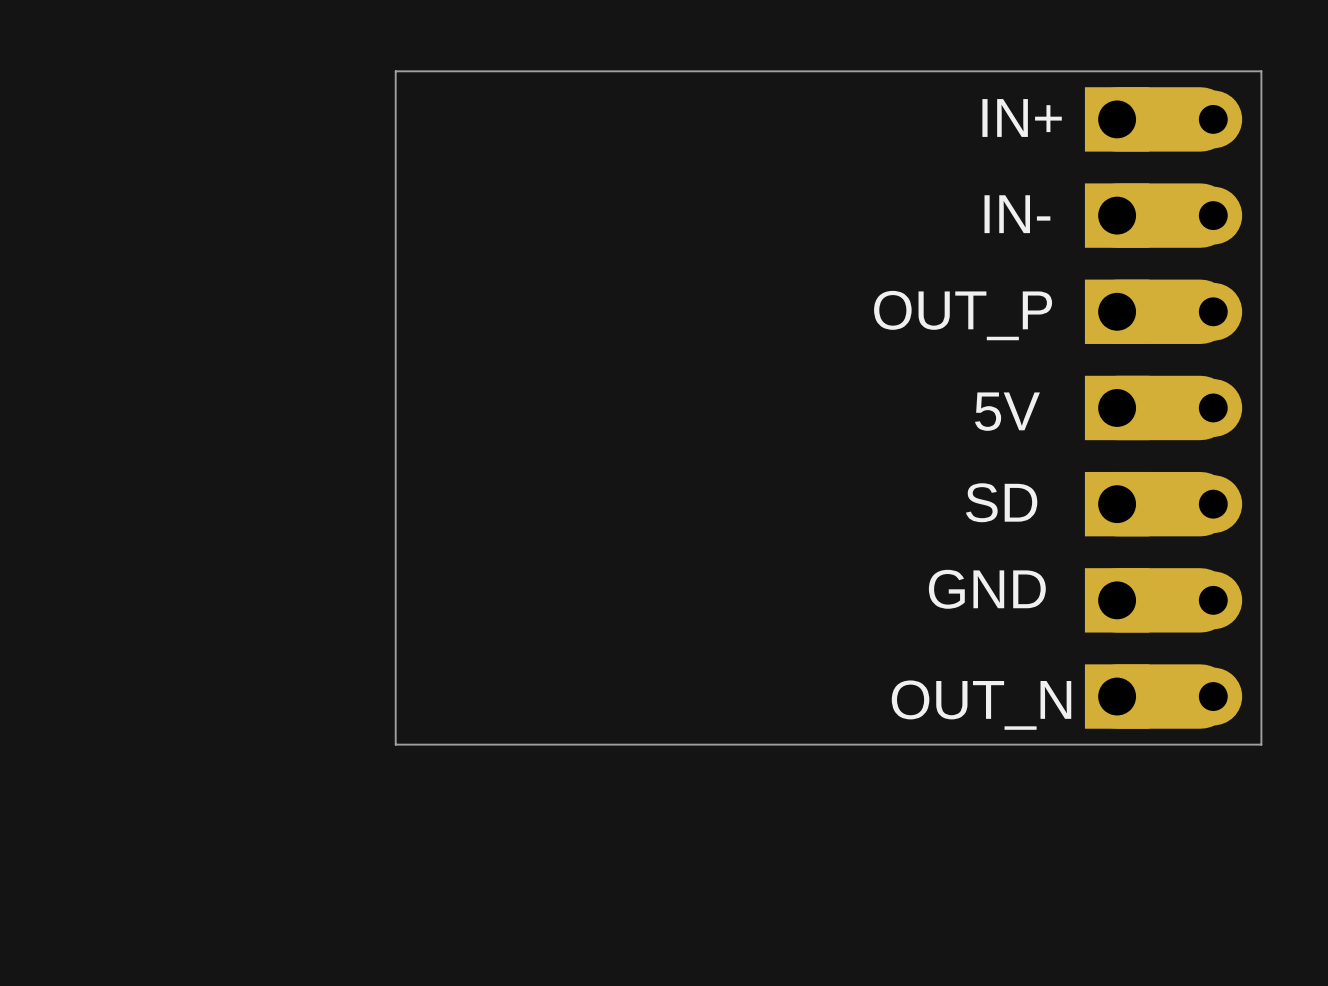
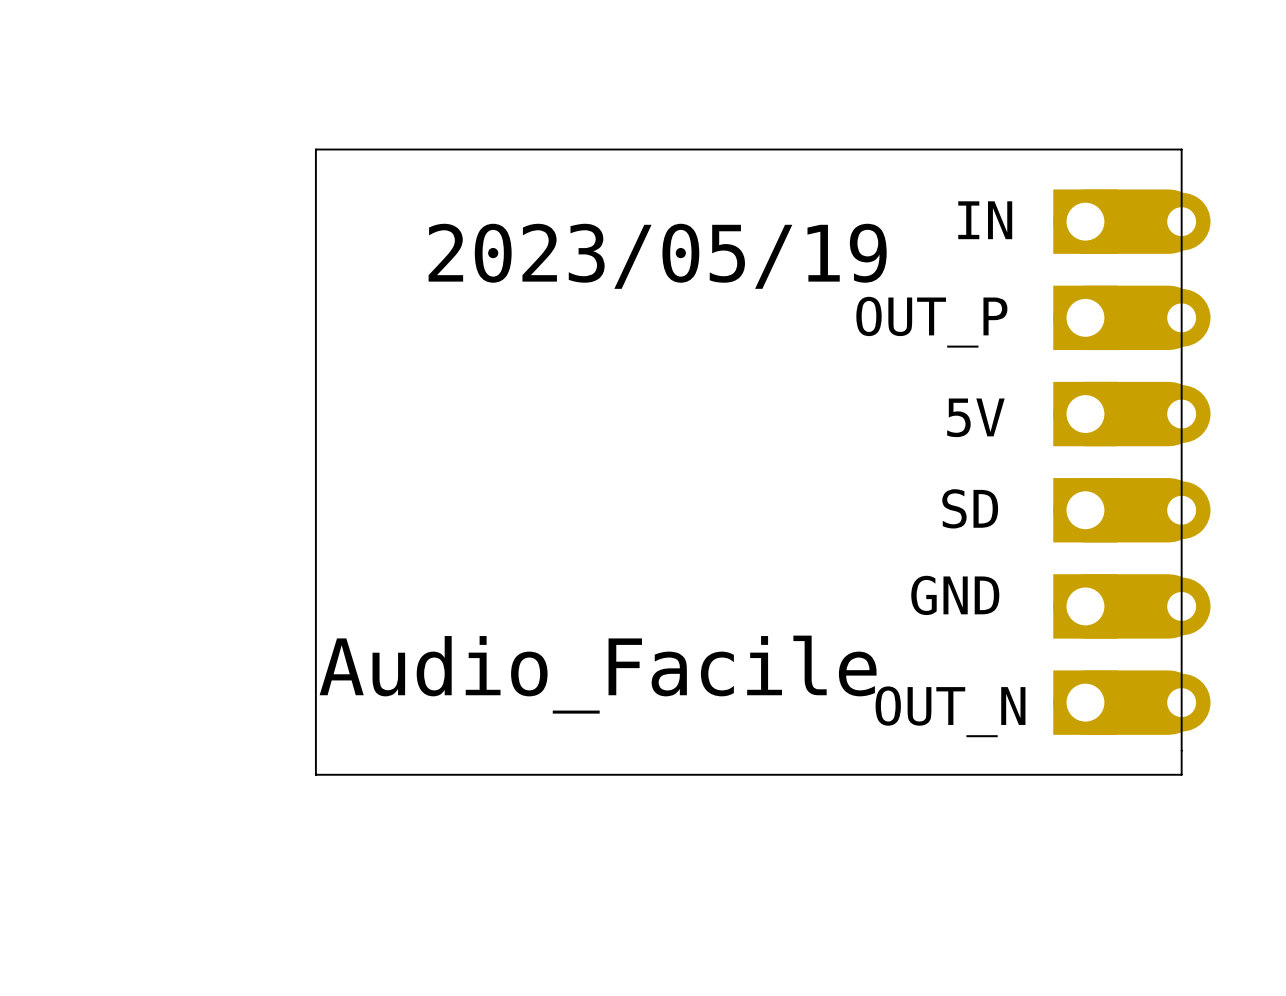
board edge: (1261, 71) (1261, 744) (395, 744) (395, 71) (1261, 71) -> (1181, 149) (1181, 774) (315, 774) (315, 149) (1181, 149)
text: IN+ (1022, 117) -> none
part: (1163, 119) -> none
text: IN- (1017, 214) -> IN (985, 220)
text: none -> 2023/05/19 (657, 256)
text: none -> Audio_Facile (598, 674)

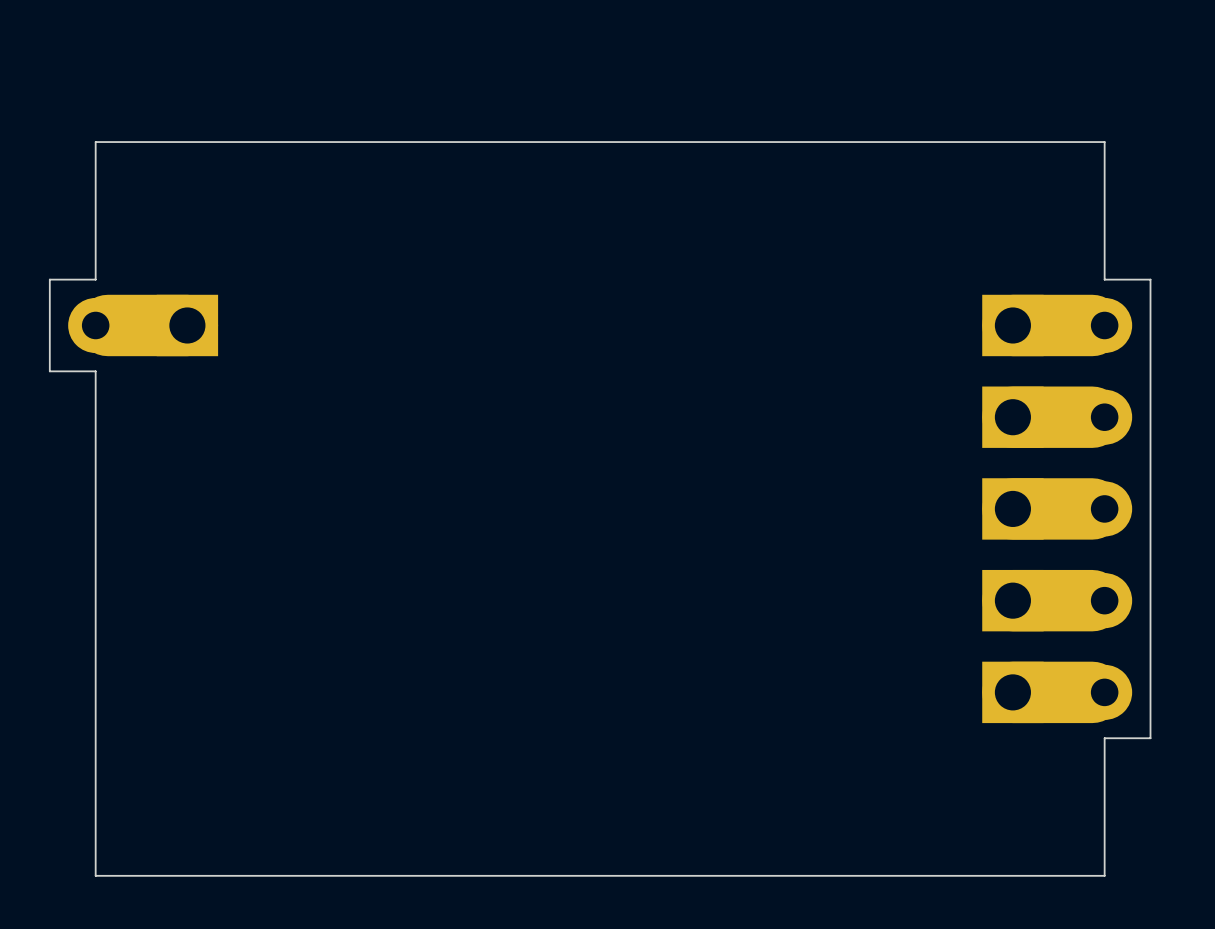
board edge: (1181, 149) (315, 149) (315, 774) (1181, 774) -> (1104, 164) (1104, 142) (95, 142) (95, 279) (49, 279) (49, 371) (95, 371) (95, 875) (1104, 875) (1104, 761)
text: IN (985, 220) -> none
part: (1131, 221) -> none
text: 2023/05/19 (657, 256) -> none
board edge: (1181, 269) (1181, 750) -> (1104, 279) (1150, 279) (1150, 738) (1104, 738)
part: none -> (143, 325)
text: OUT_P (931, 322) -> none
text: 5V (975, 417) -> none
text: SD (970, 508) -> none
text: GND (955, 595) -> none
text: Audio_Facile (598, 674) -> none
text: OUT_N (950, 711) -> none

